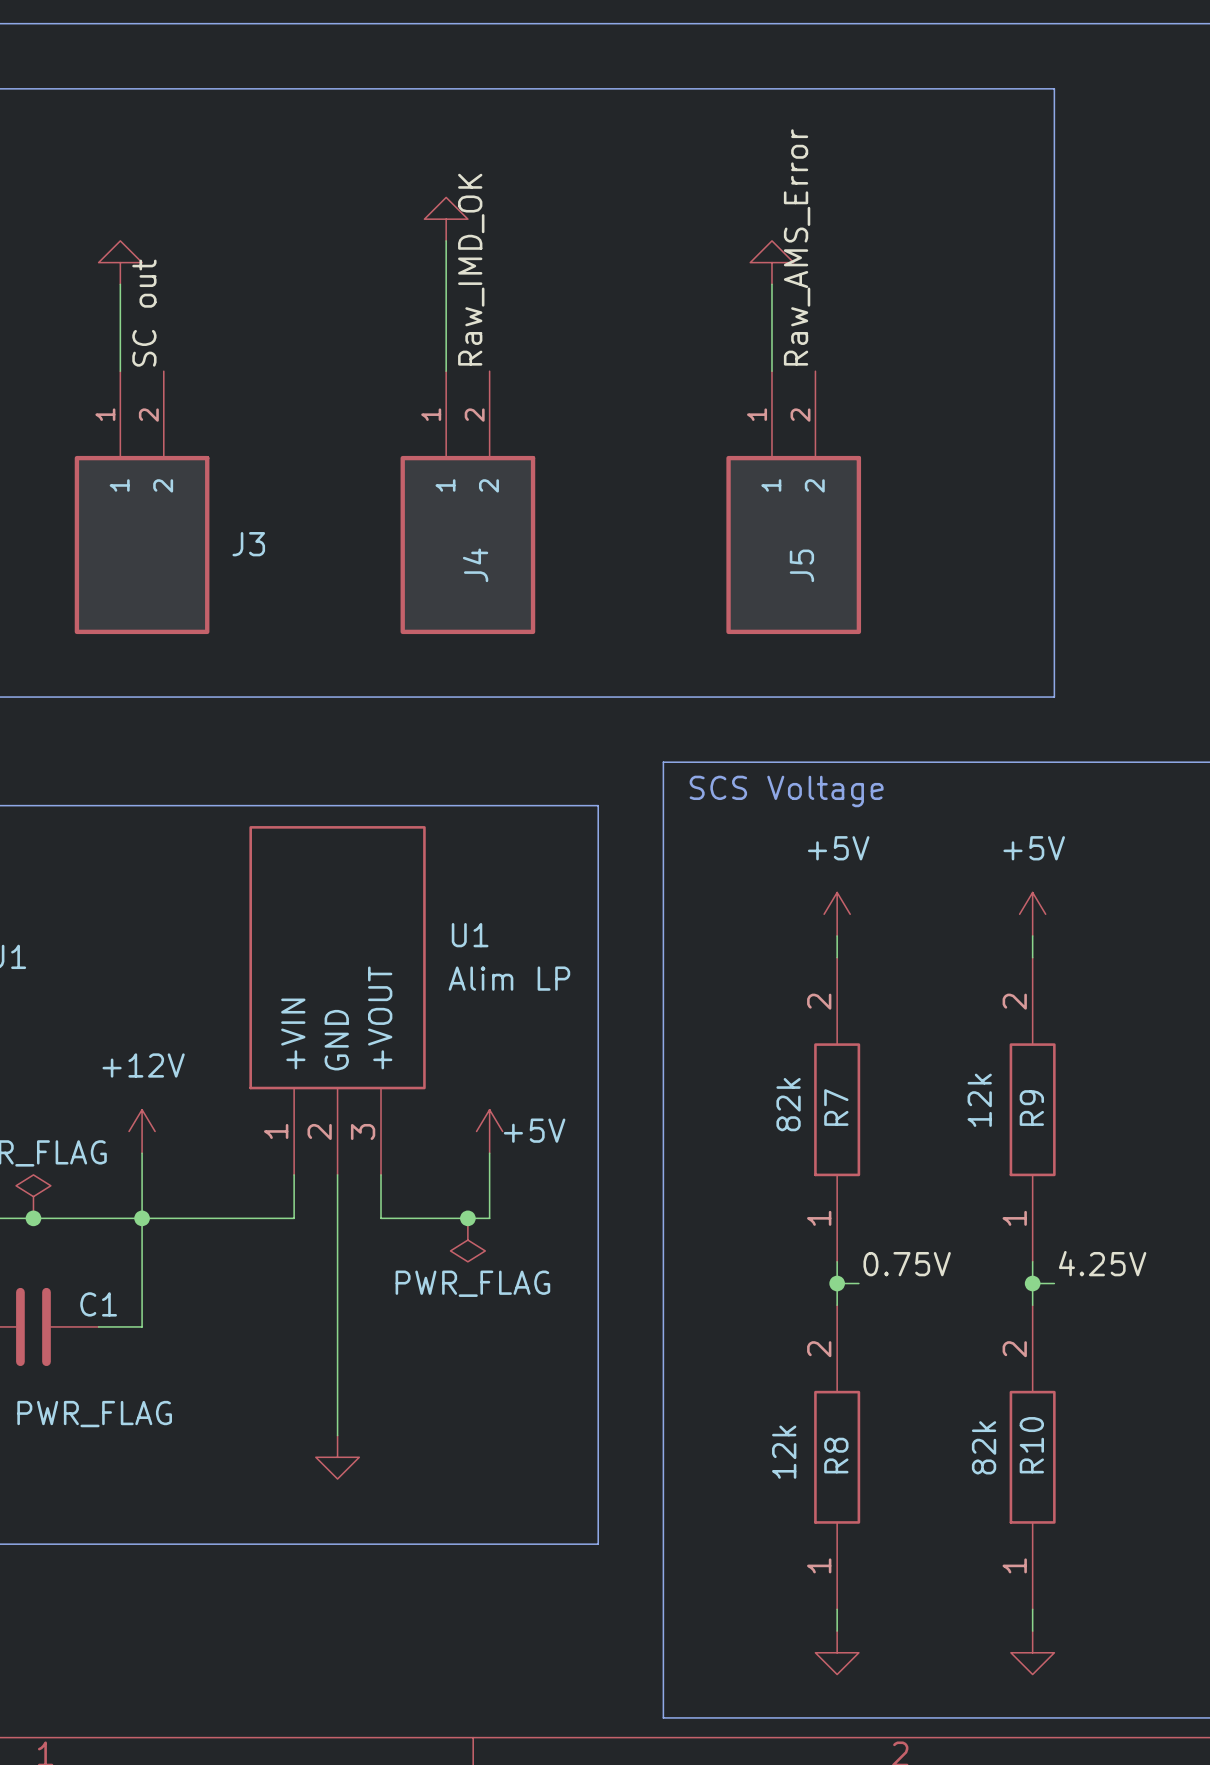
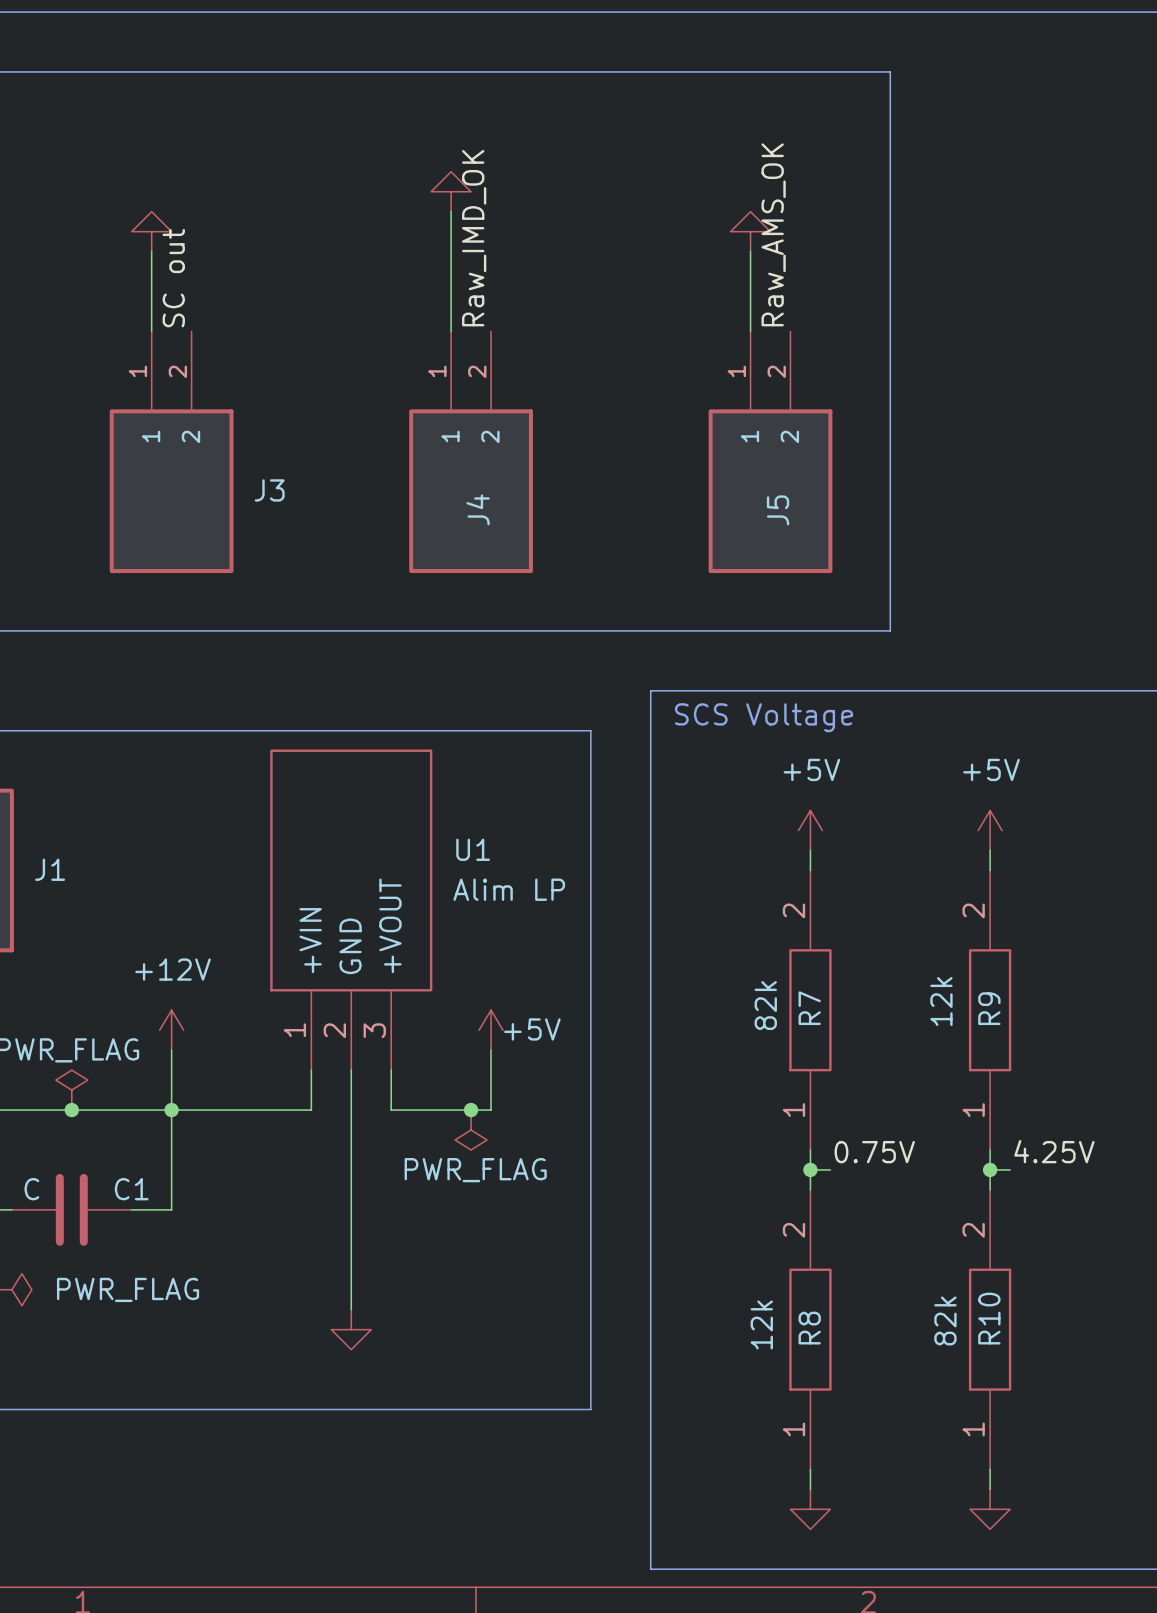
line: (924, 88) (1054, 88) (1054, 697) (924, 697) -> (890, 71) (890, 630)
label: Raw_AMS_Error (797, 247) -> Raw_AMS_OK (773, 234)

